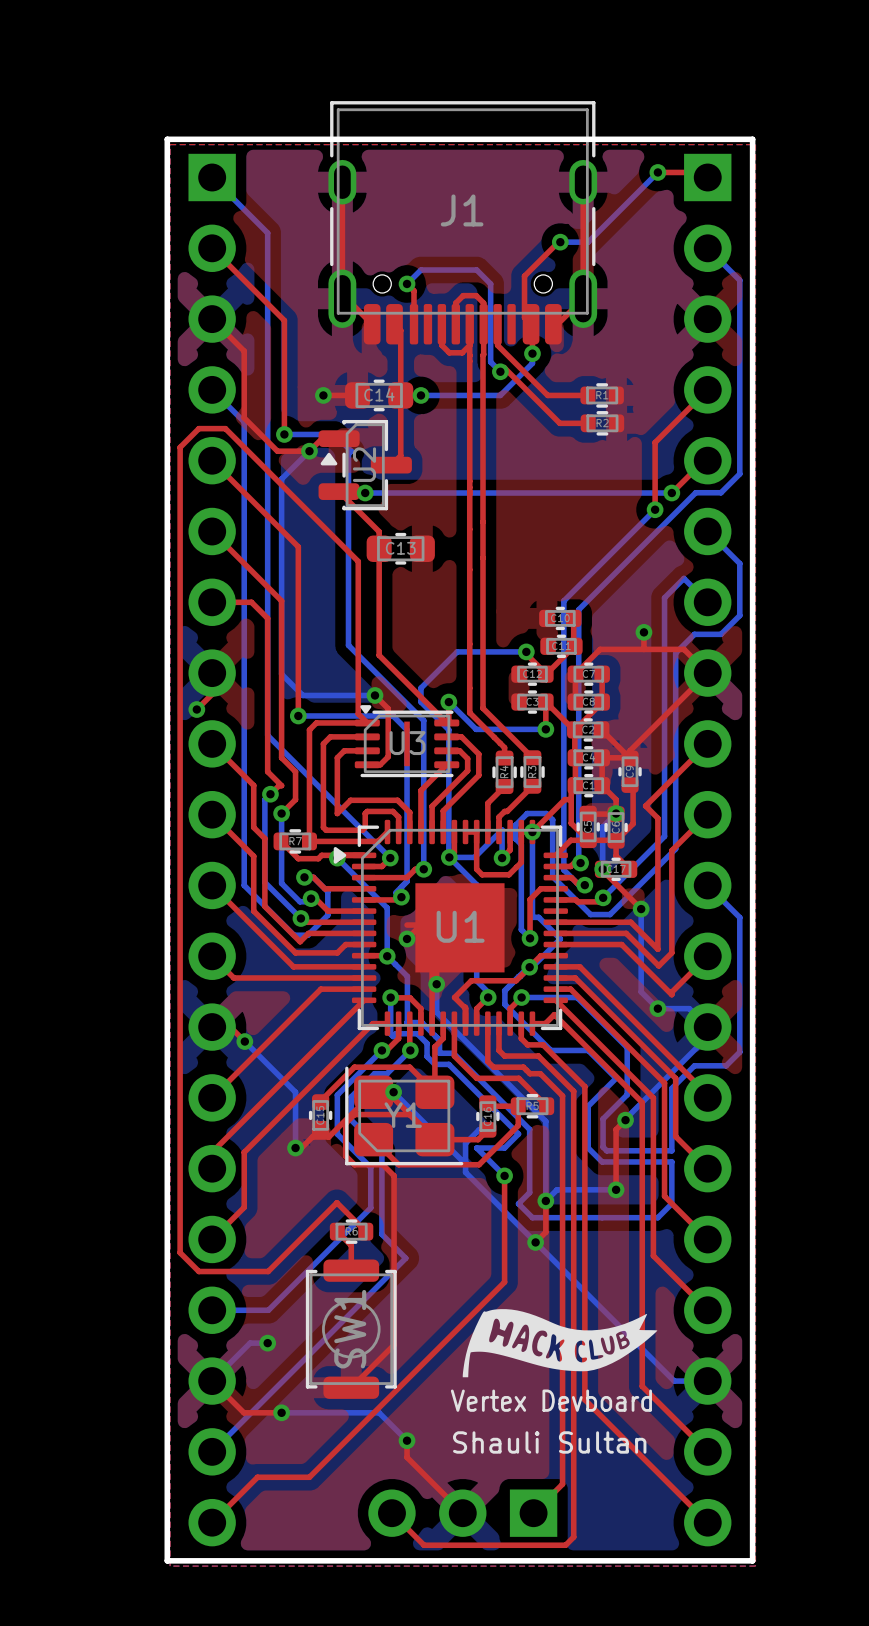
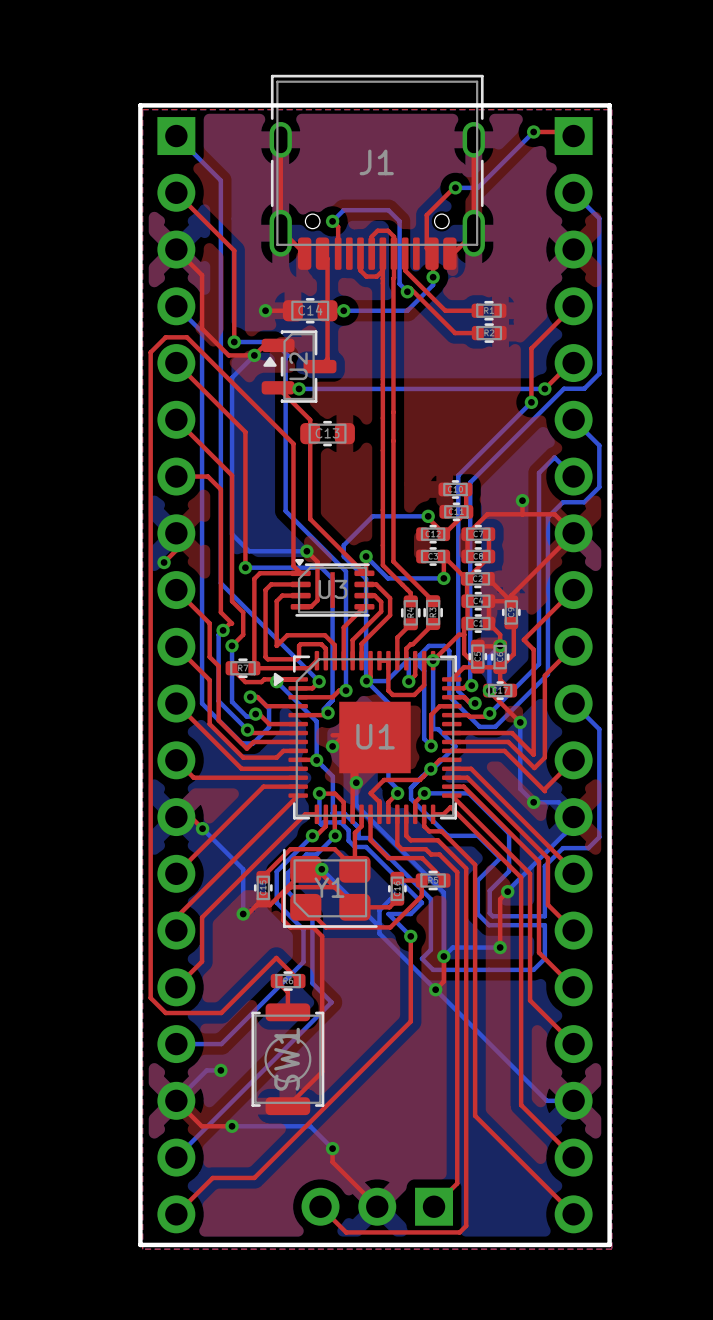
drawing: [462, 1309, 658, 1378] -> none
text: Vertex Devboard (551, 1400) -> none
text: Shauli Sultan (549, 1442) -> none

